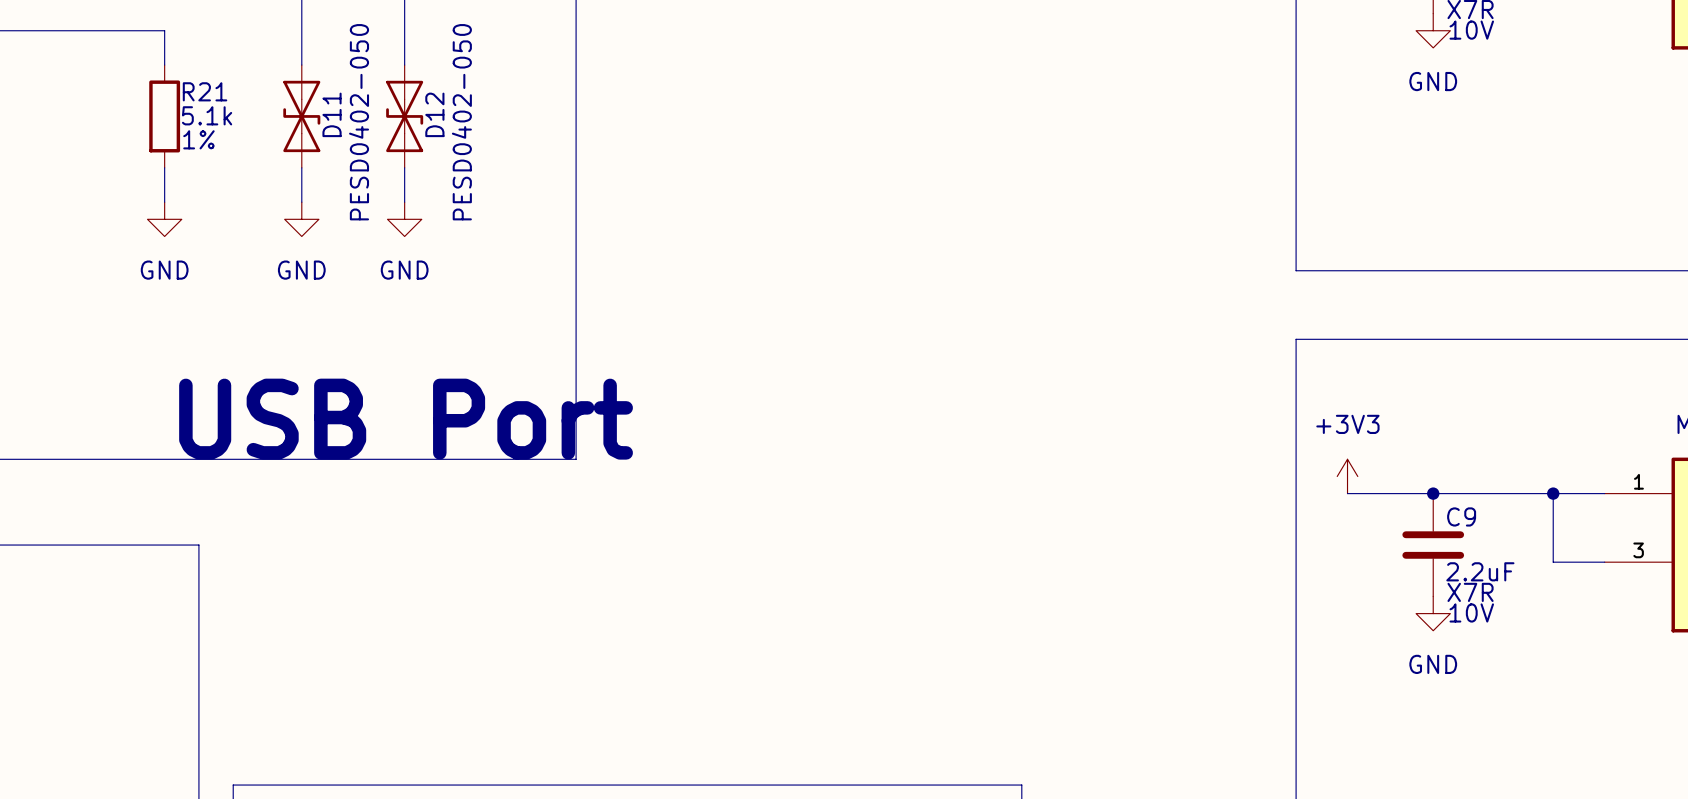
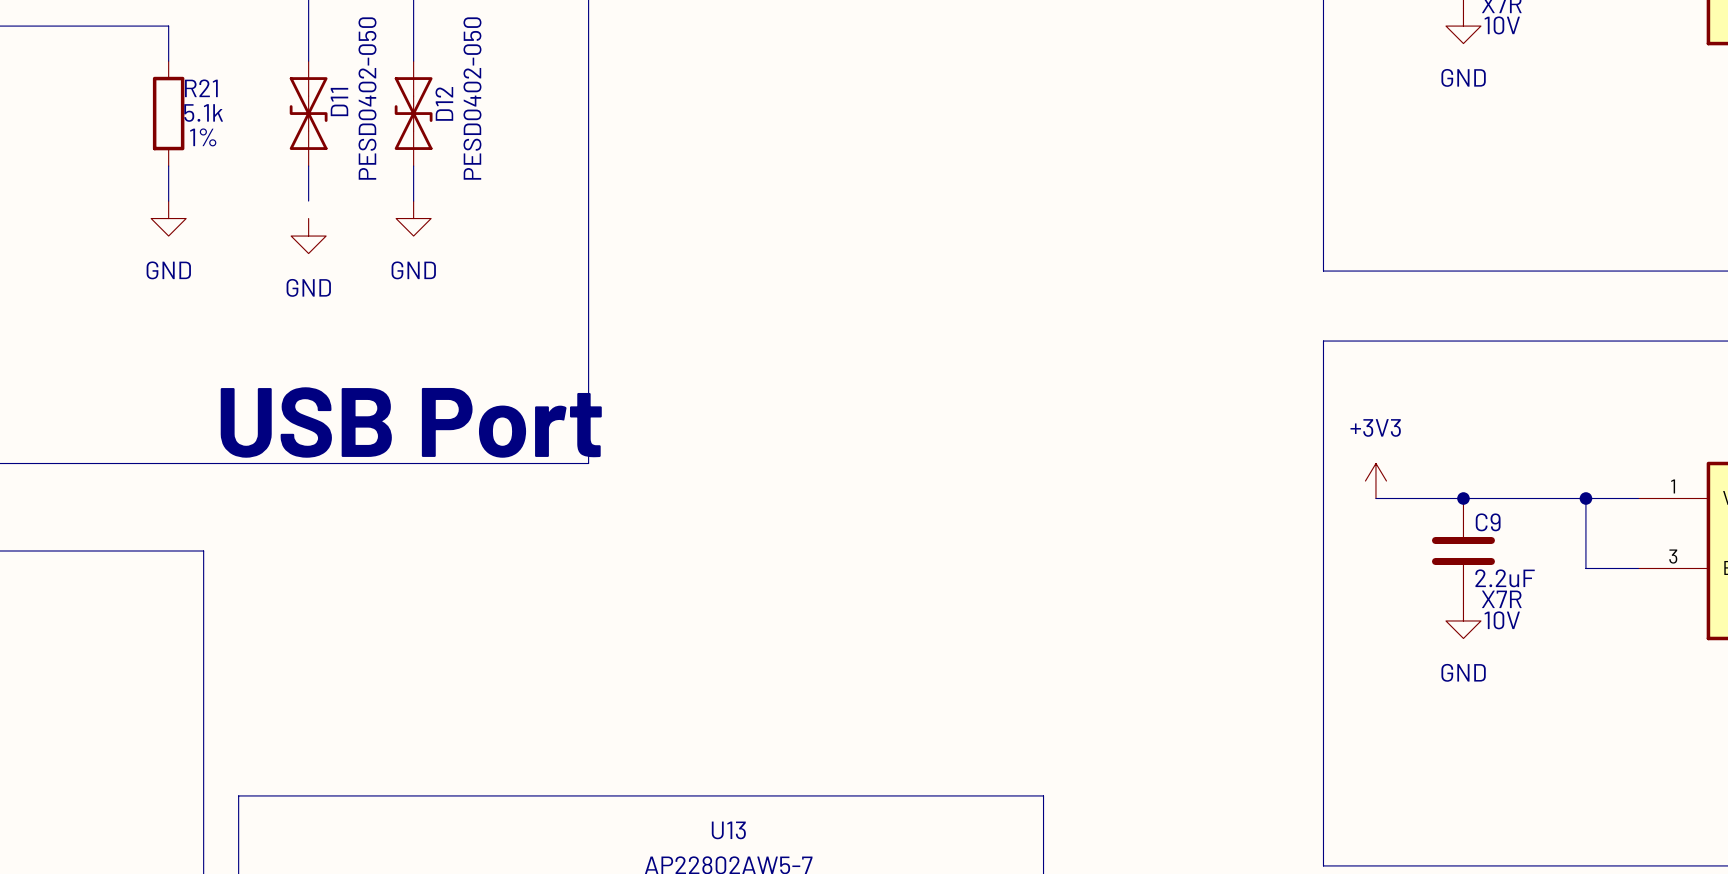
power symbol position: GND (301, 219) -> GND (308, 236)

